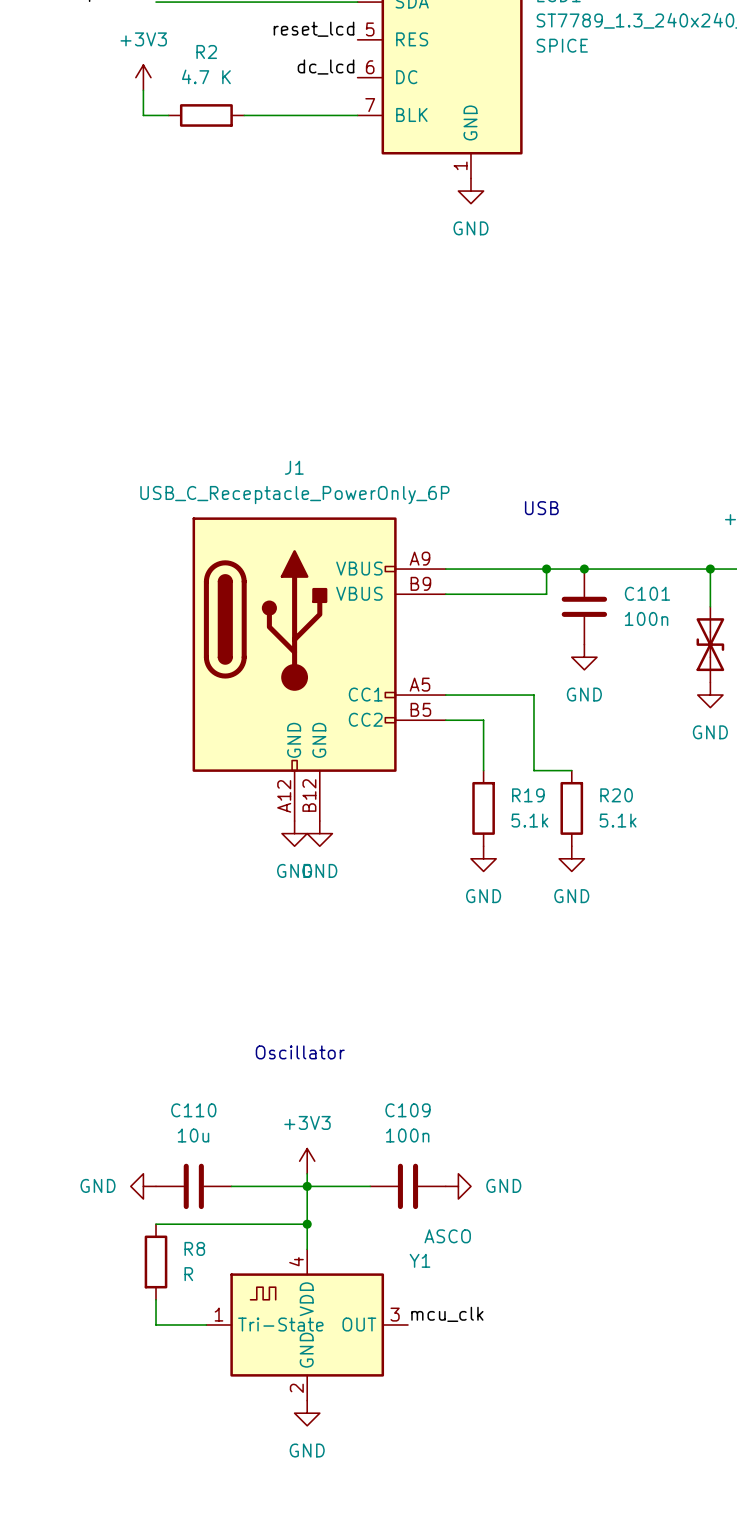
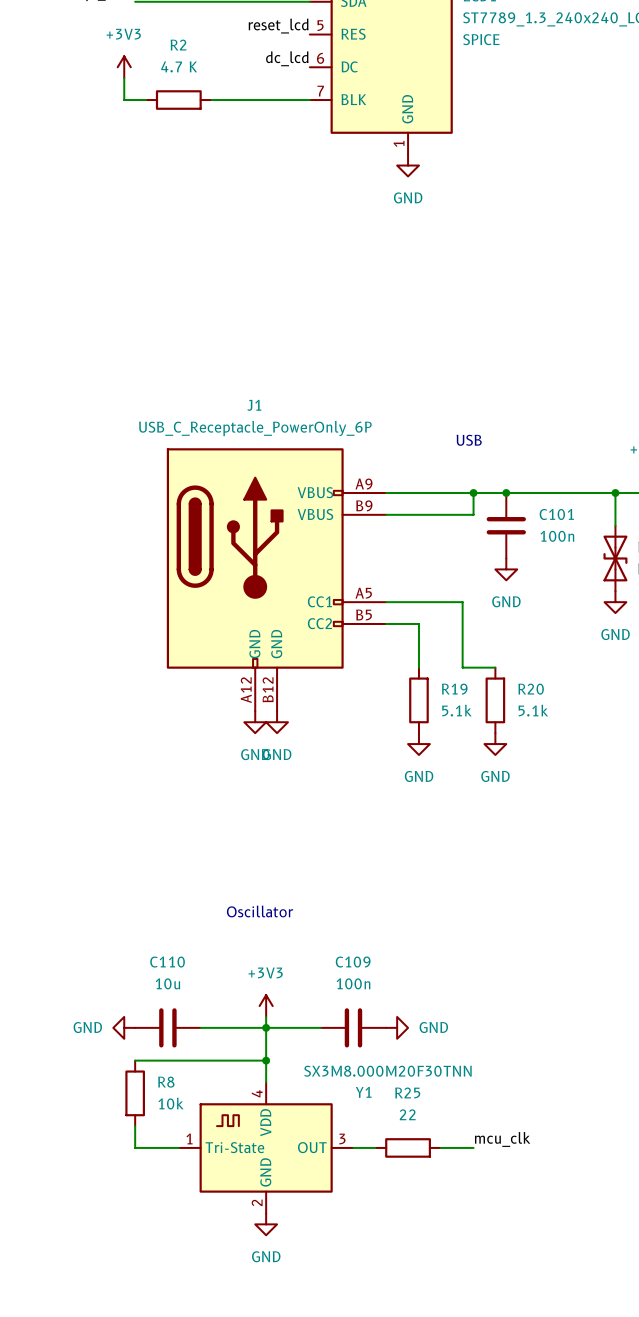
Y1 value: ASCO (447, 1236) -> SX3M8.000M20F30TNN (387, 1071)
R8 value: R (188, 1274) -> 10k (170, 1103)
label position: mcu_clk (447, 1314) -> mcu_clk (502, 1139)
wire: none -> (353, 1147) (375, 1147)
R25: none -> 22 (408, 1147)
wire: none -> (440, 1147) (473, 1147)

